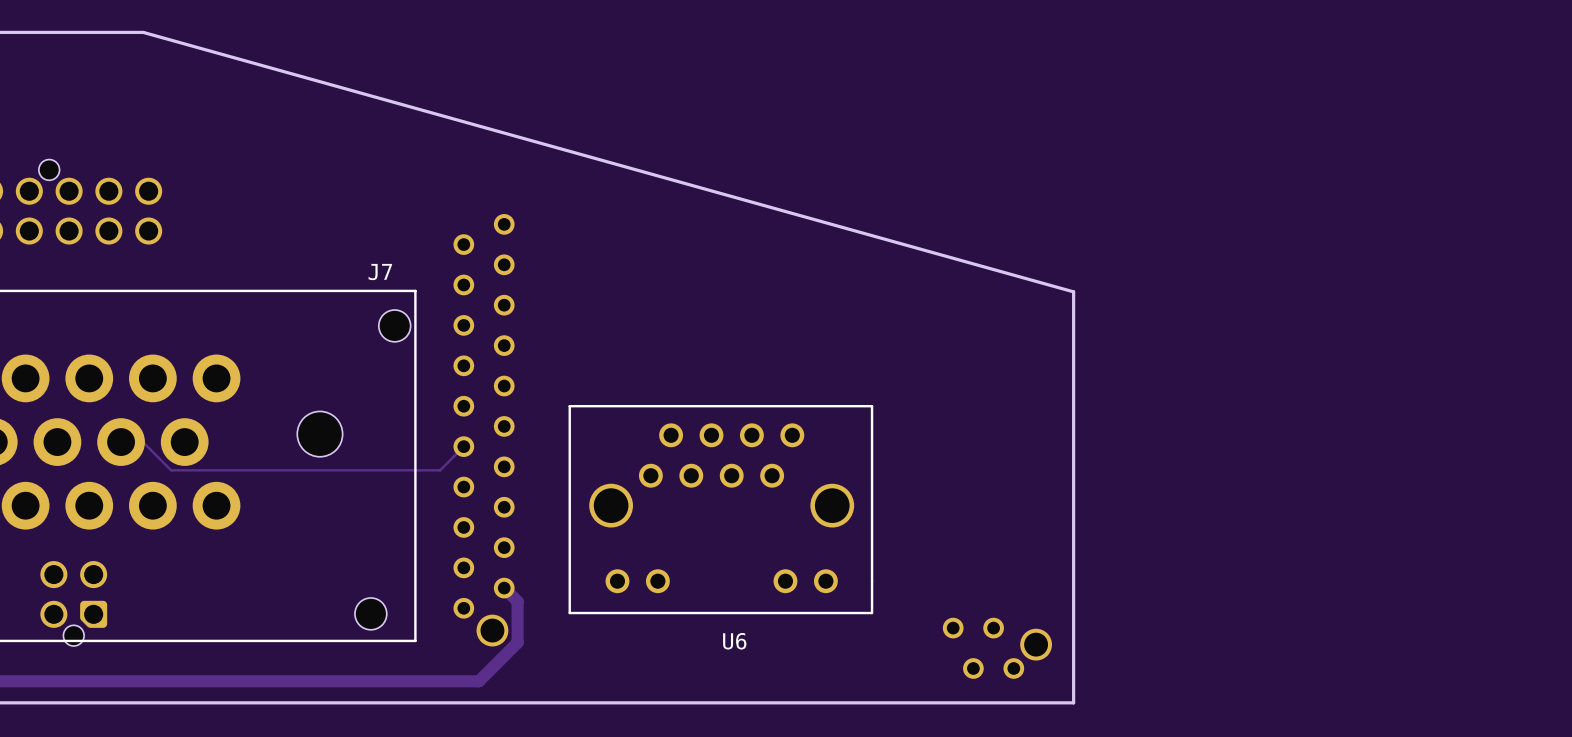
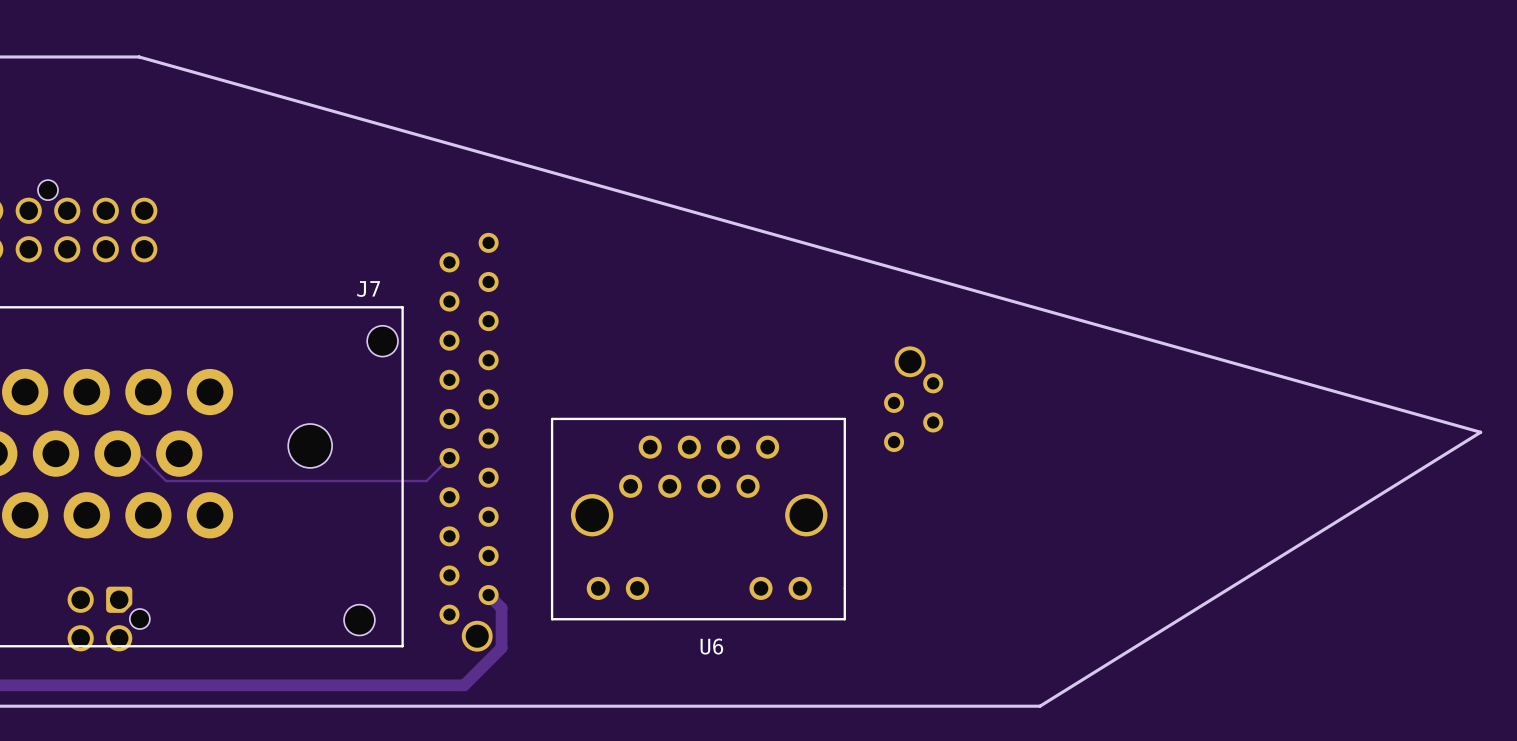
board edge: (143, 32) (1073, 291) (1073, 702) -> (139, 56) (1480, 432) (1040, 706)
part rotation: 0° (73, 603) -> 90° counterclockwise (108, 619)
part rotation: 0° (997, 648) -> 90° counterclockwise (913, 399)
part position: (997, 648) -> (913, 399)

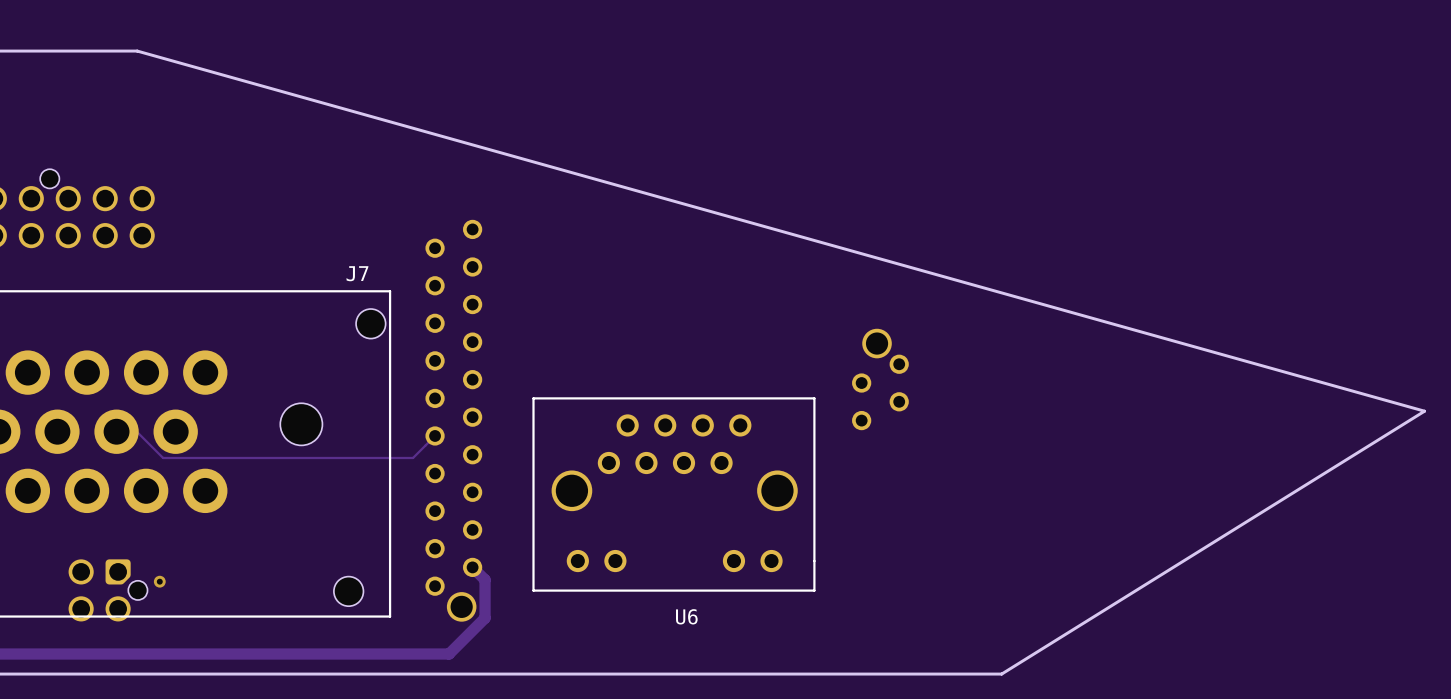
via: none -> (159, 581)

